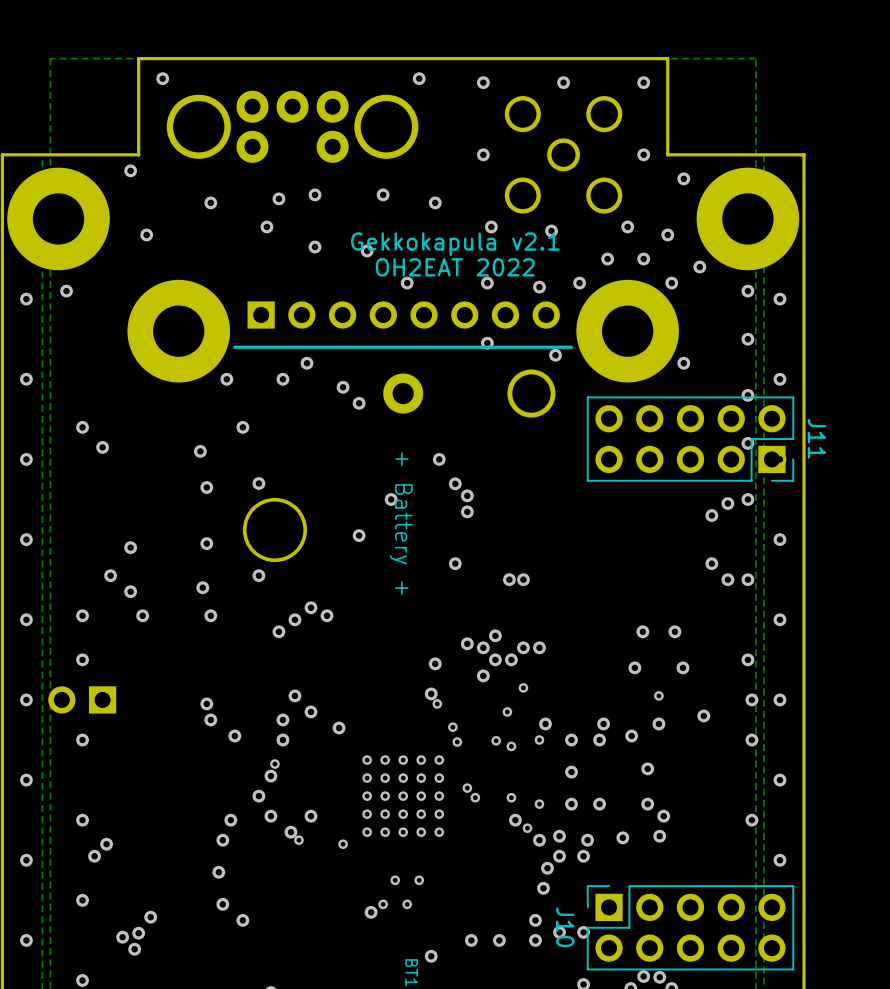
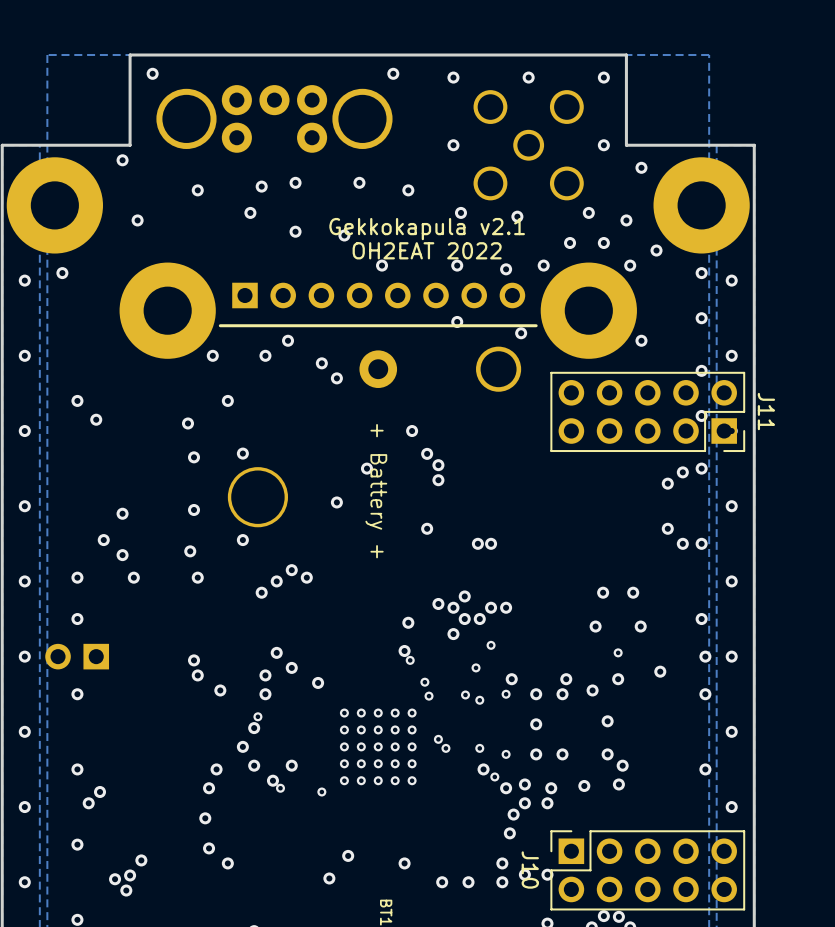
via: (395, 880) -> none
via: (419, 880) -> none
via: (383, 904) -> none
via: (407, 904) -> none
via: none -> (404, 863)
via: none -> (329, 878)
via: (431, 956) -> none

